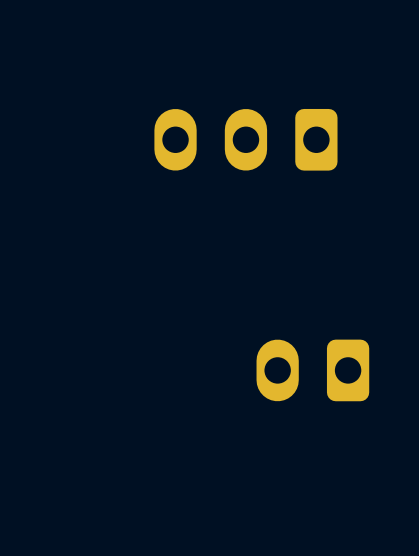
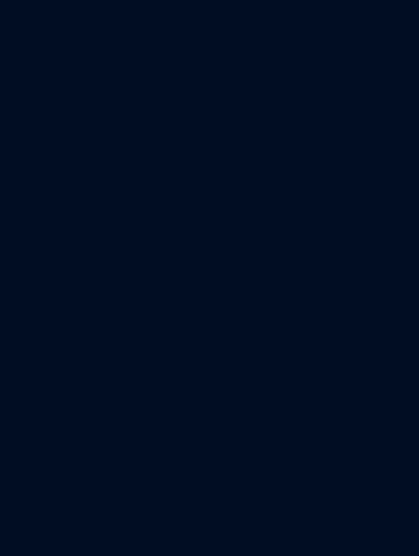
part: (245, 139) -> none
part: (312, 370) -> none

